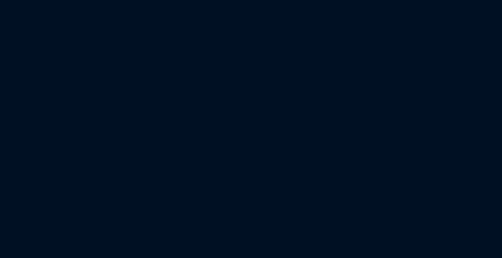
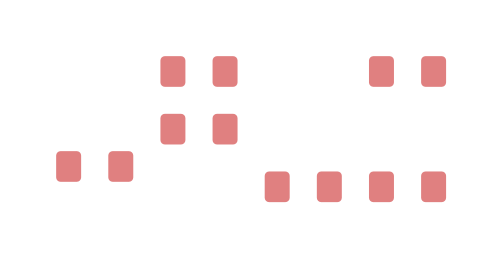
part: none -> (198, 71)
part: none -> (407, 71)
part: none -> (198, 129)
part: none -> (94, 166)
part: none -> (303, 186)
part: none -> (407, 186)

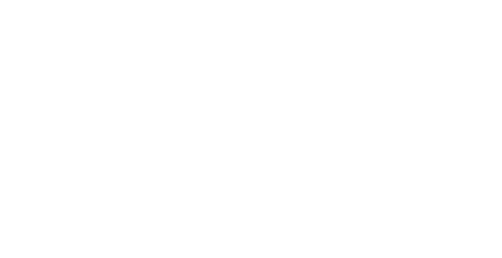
part: (198, 71) -> none
part: (407, 71) -> none
part: (198, 129) -> none
part: (94, 166) -> none
part: (303, 186) -> none
part: (407, 186) -> none

